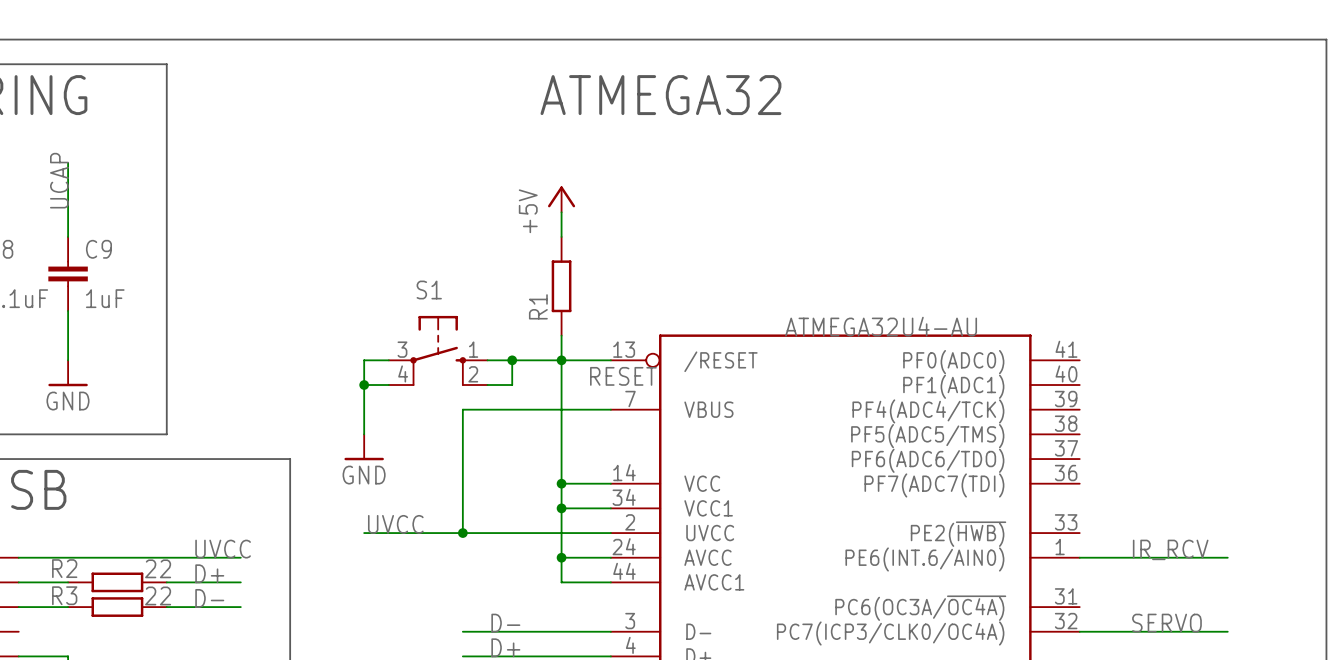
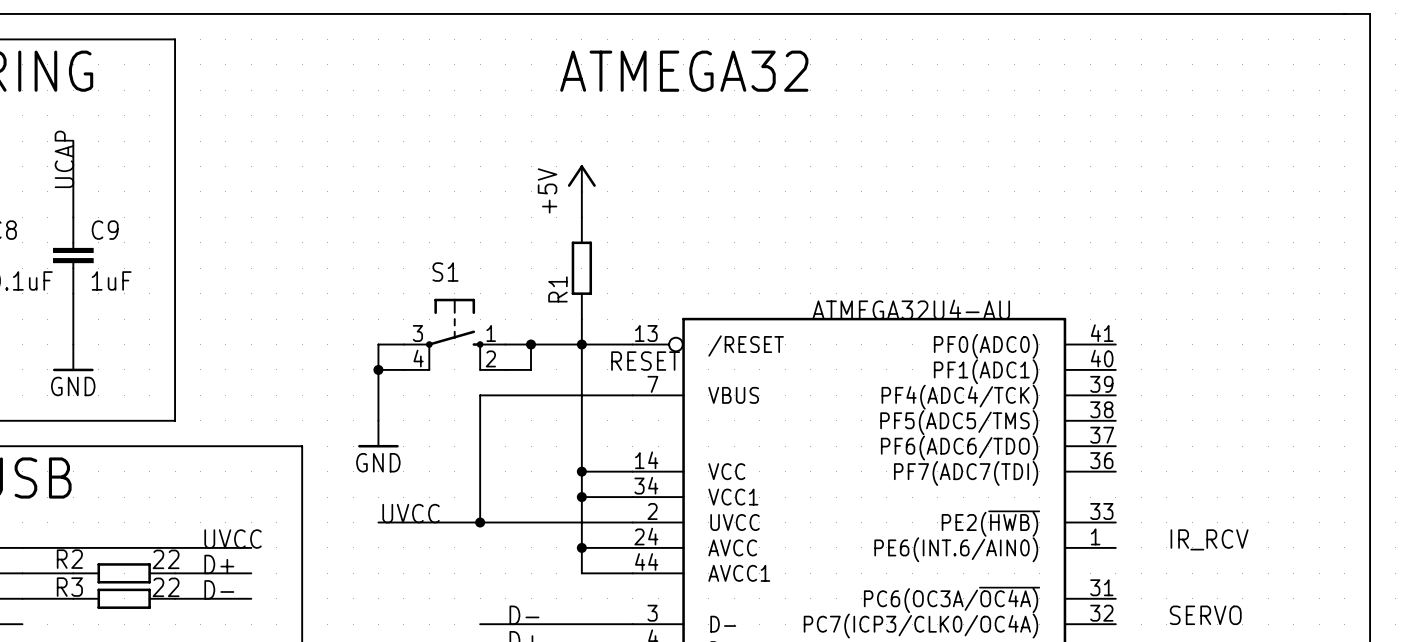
wire: (1079, 557) (1227, 557) -> none
wire: (1079, 631) (1227, 631) -> none

